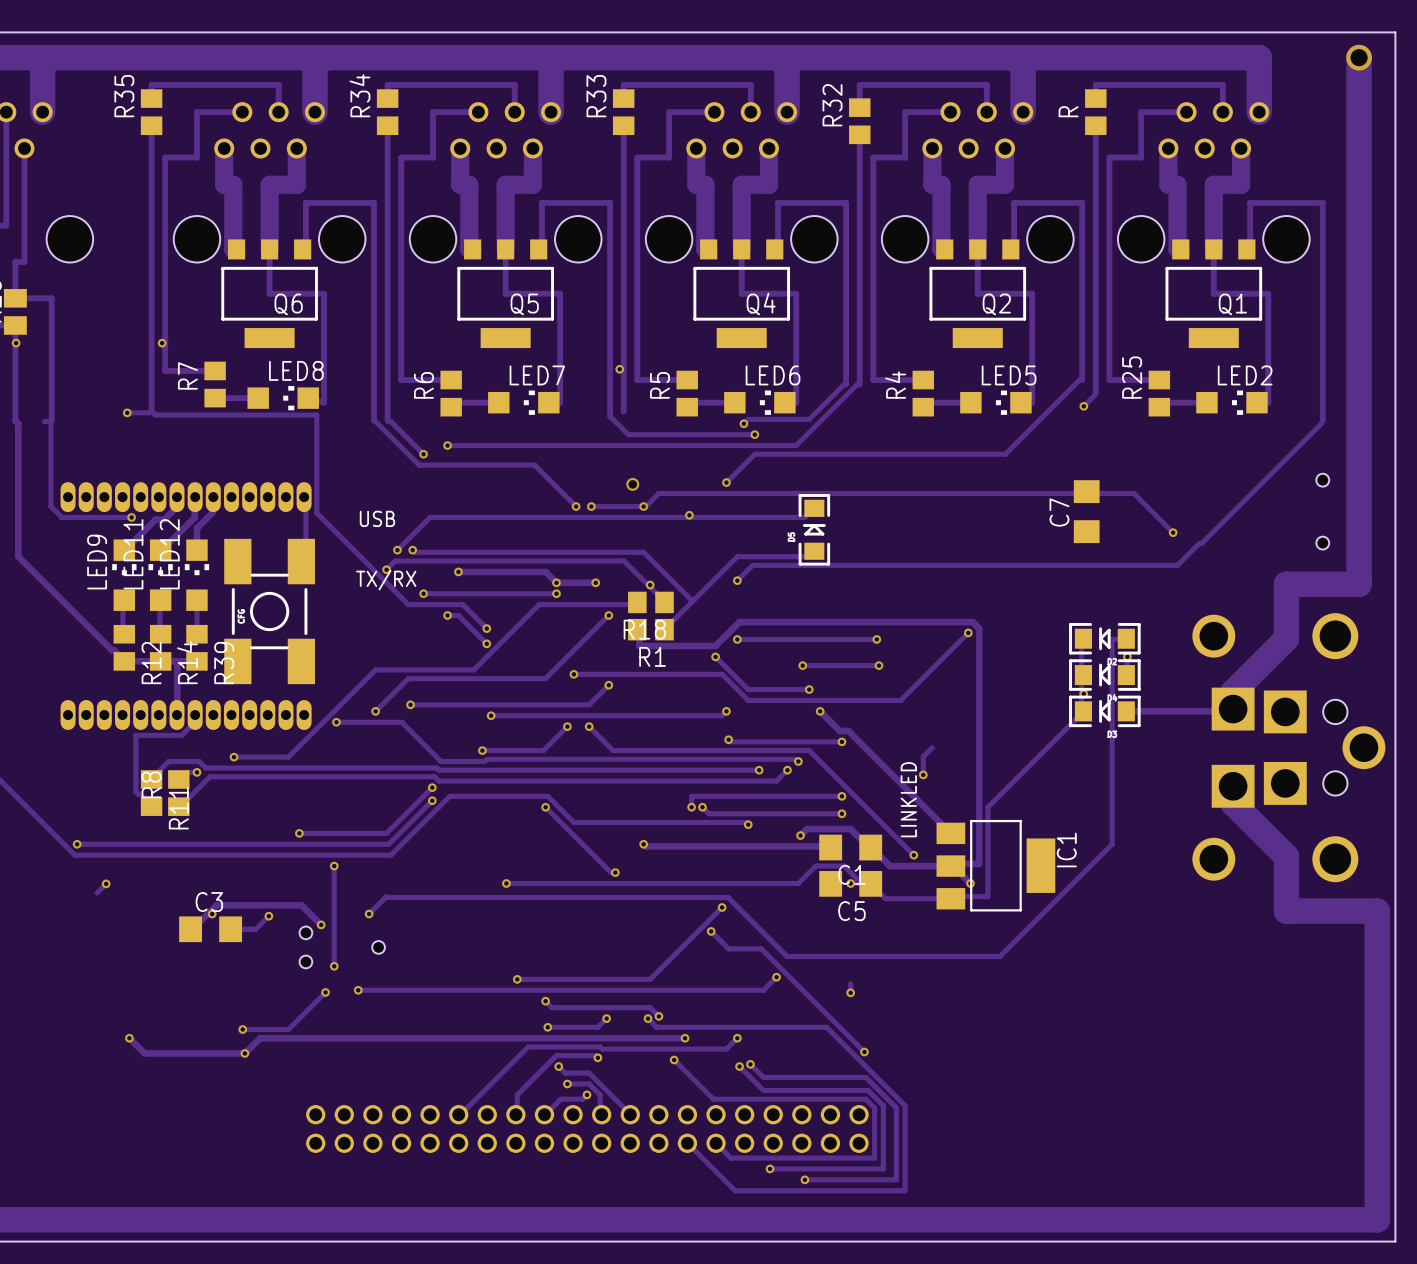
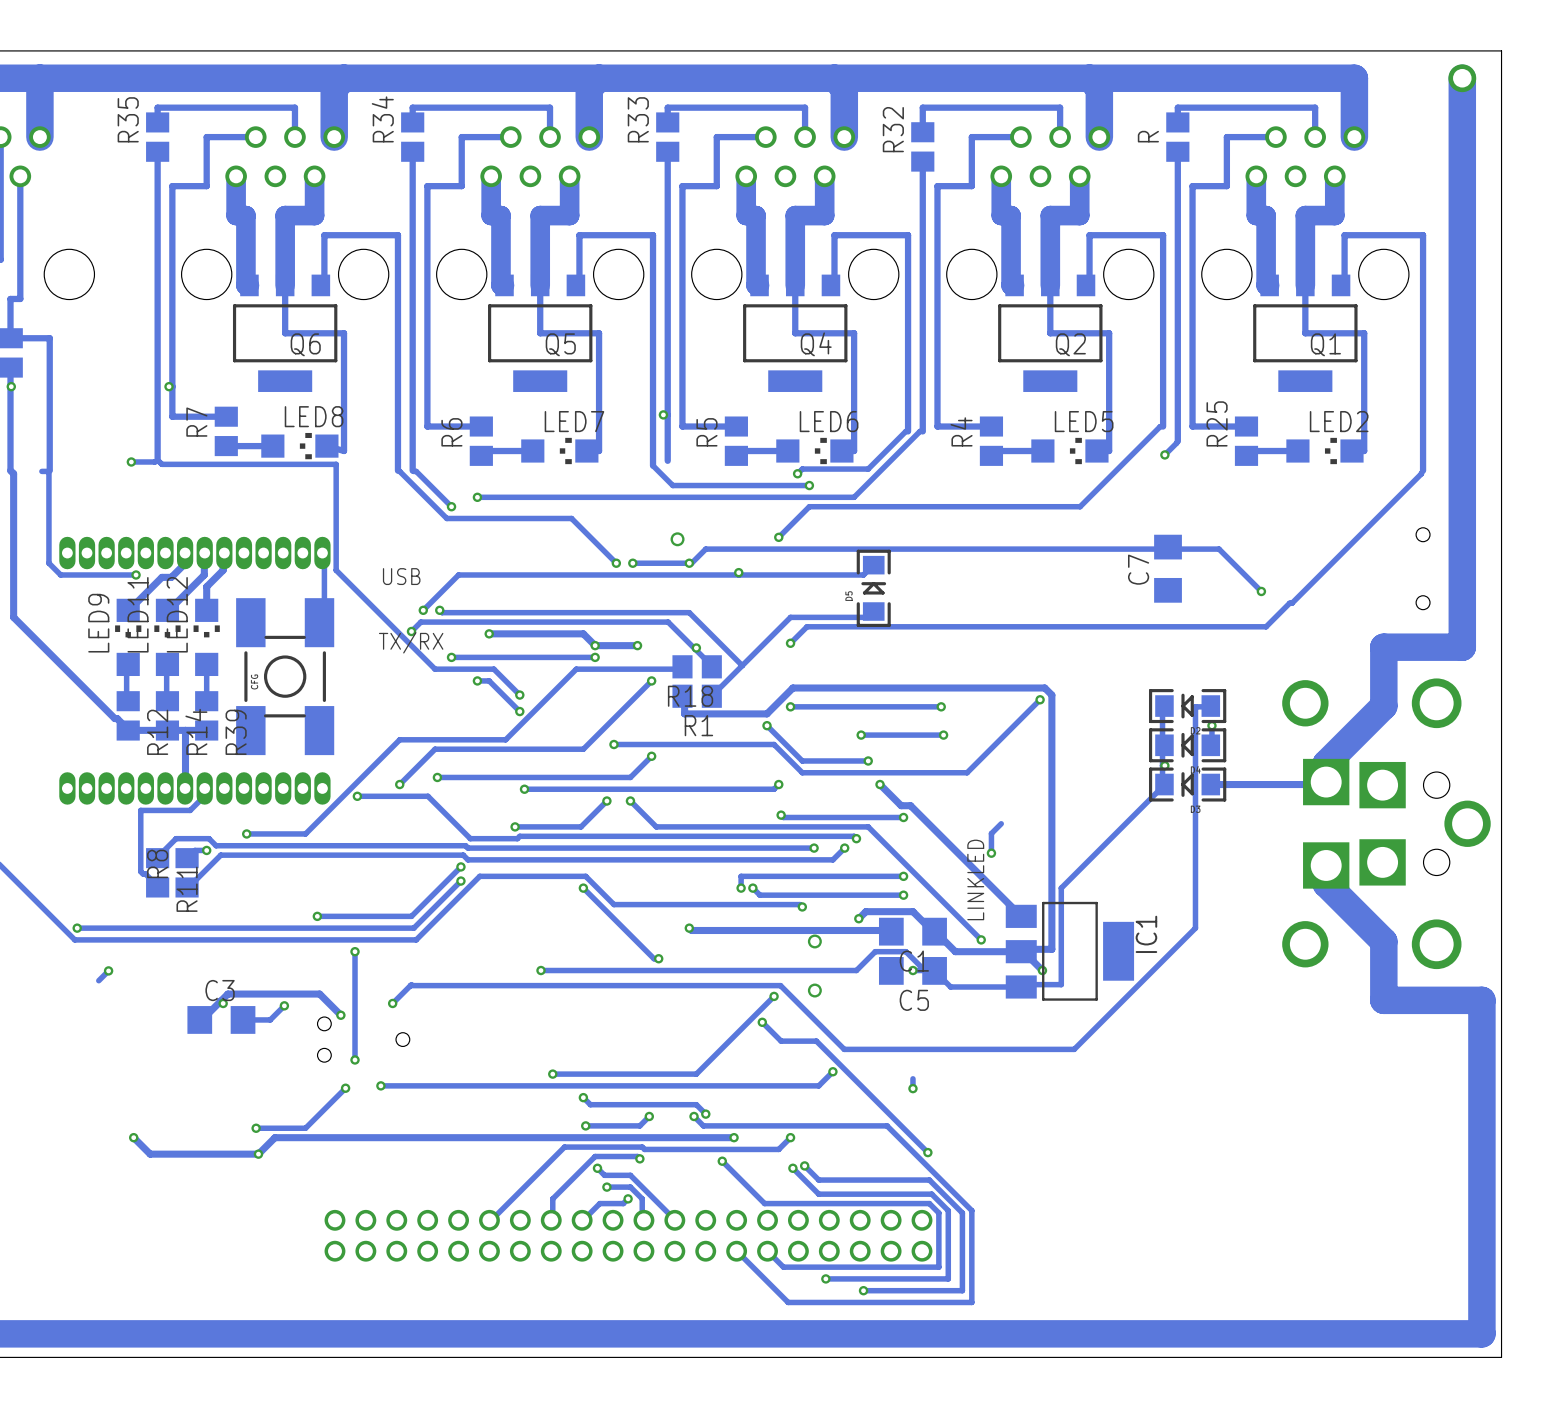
via: none -> (814, 941)
via: none -> (814, 990)

